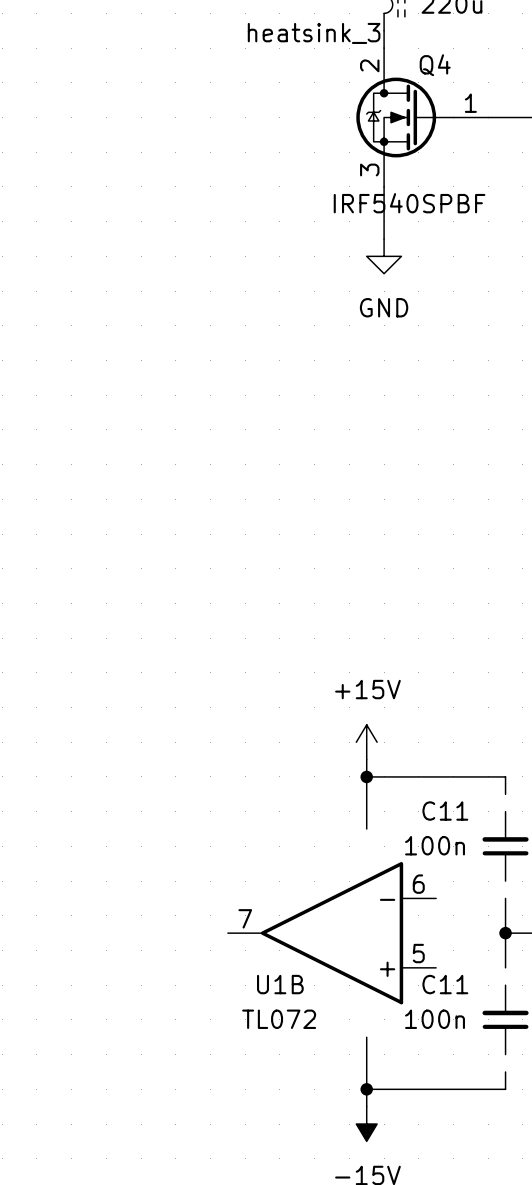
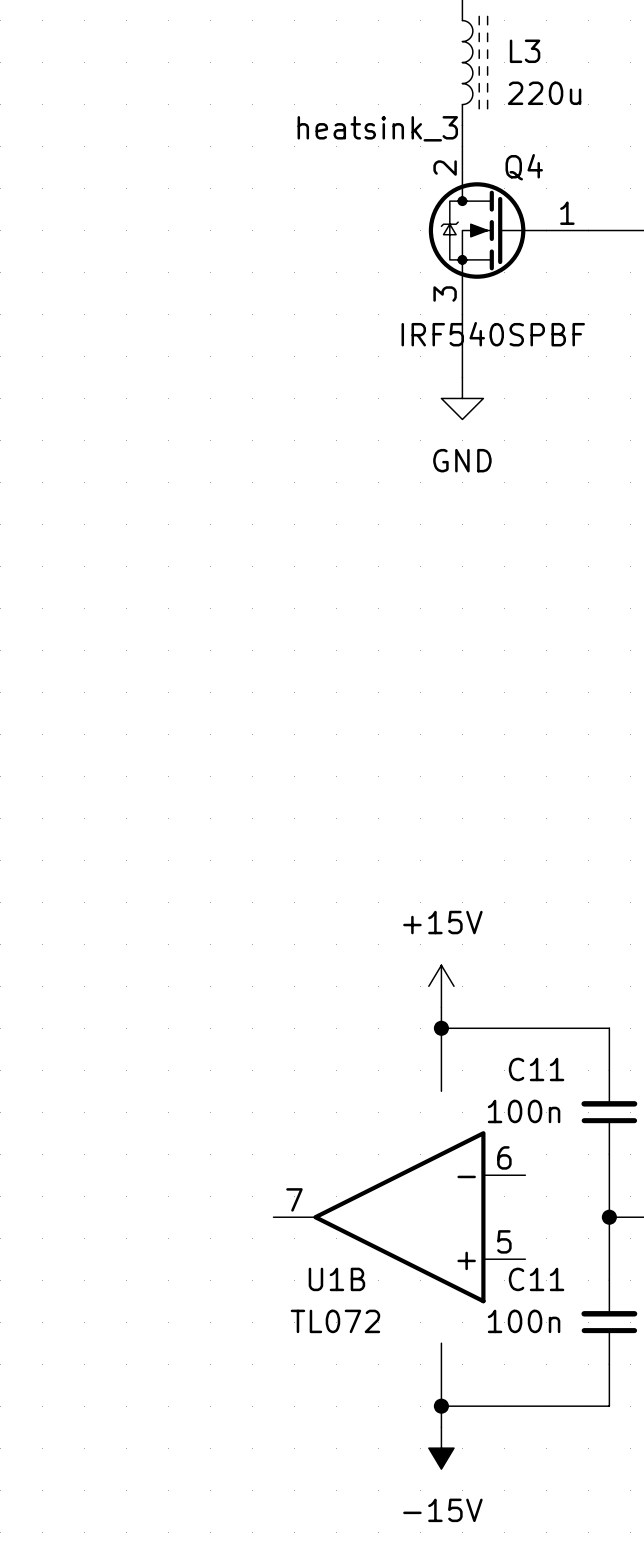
wire: none -> (609, 1049) (609, 1070)
wire: none -> (609, 1154) (609, 1175)
wire: none -> (609, 1259) (609, 1280)
wire: none -> (609, 1364) (609, 1385)

